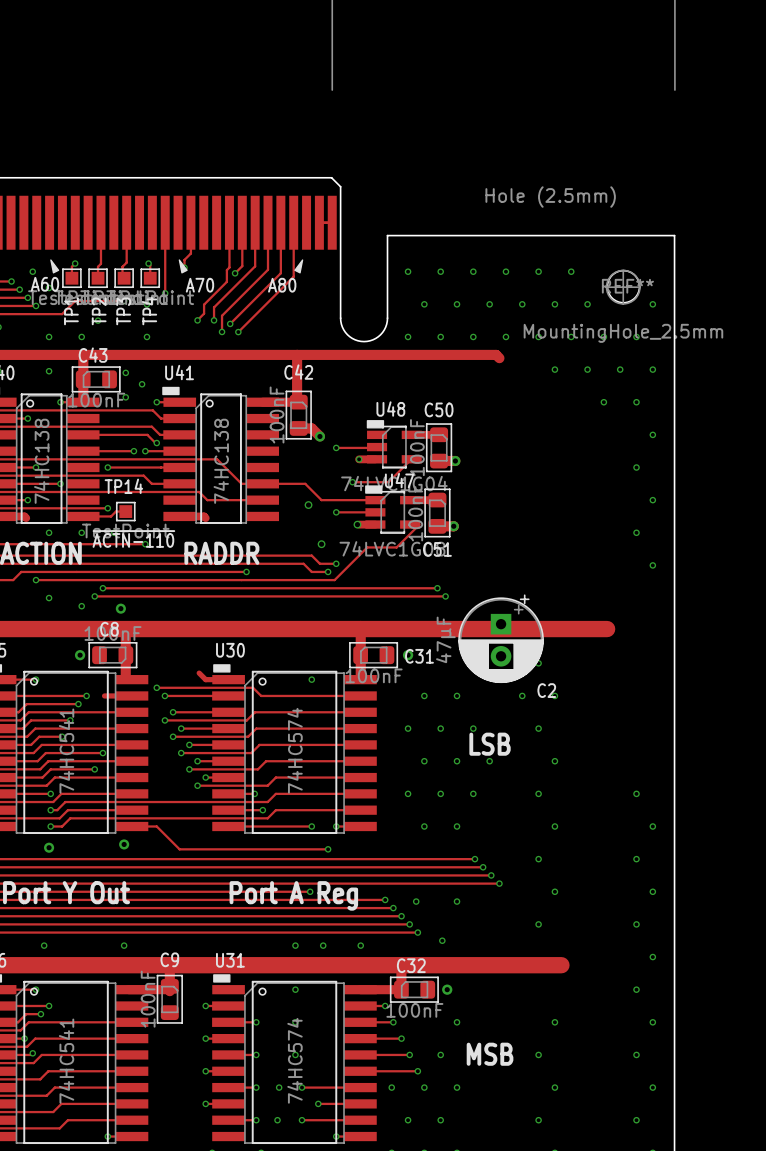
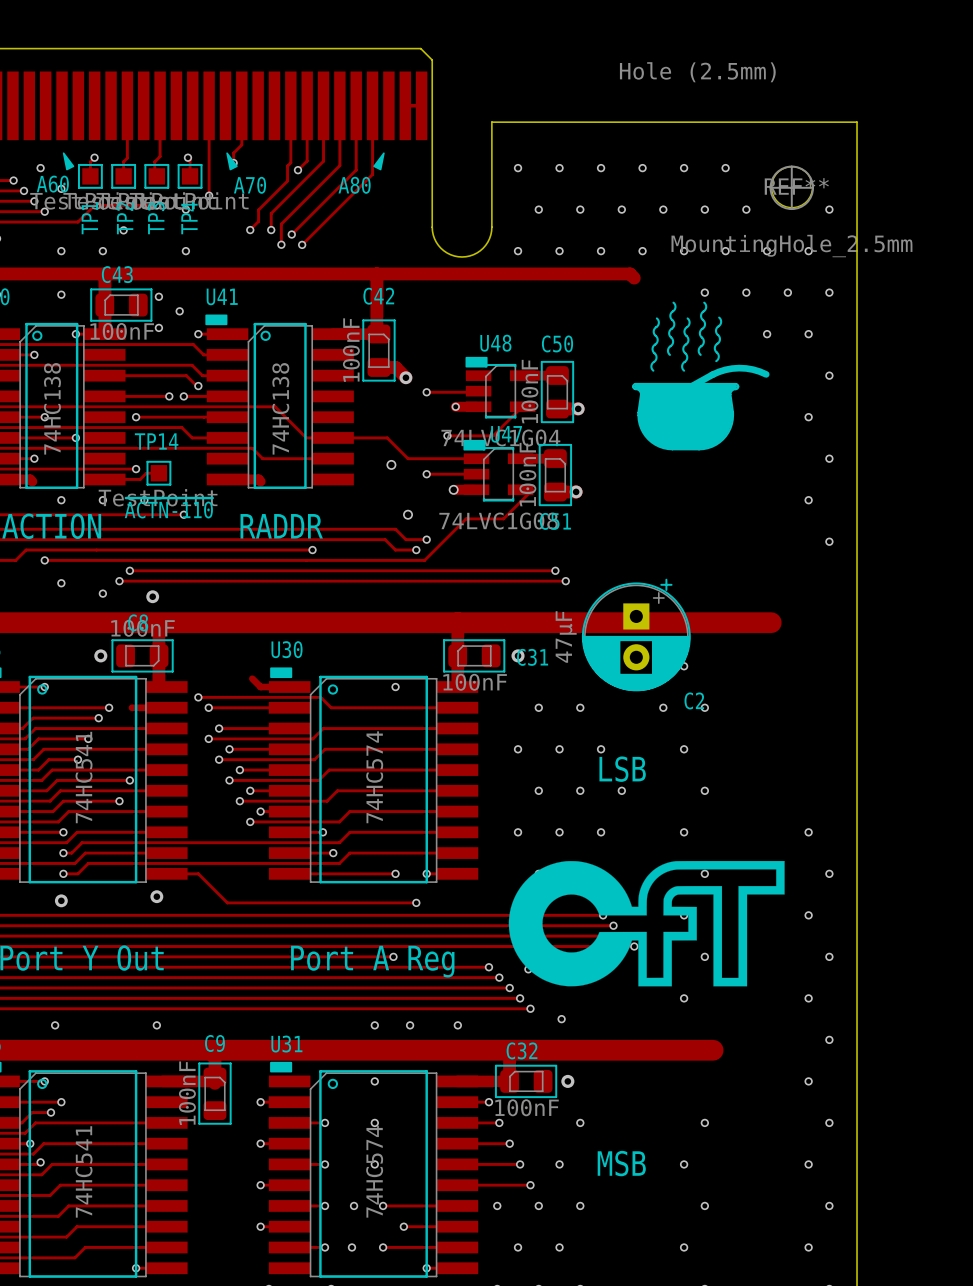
drawing: none -> [632, 301, 770, 451]
drawing: none -> [508, 860, 785, 987]

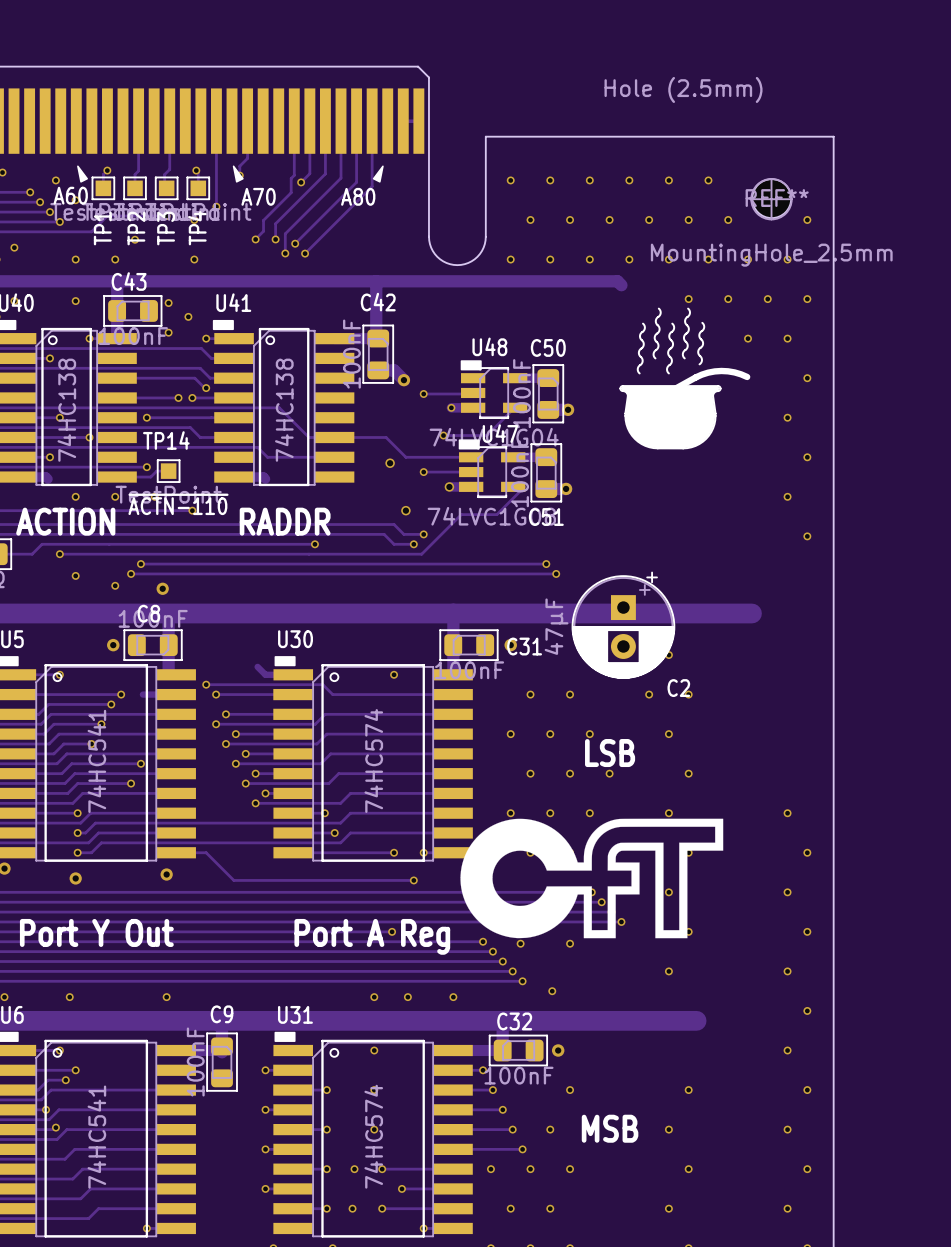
drawing position: (646, 923) -> (591, 878)

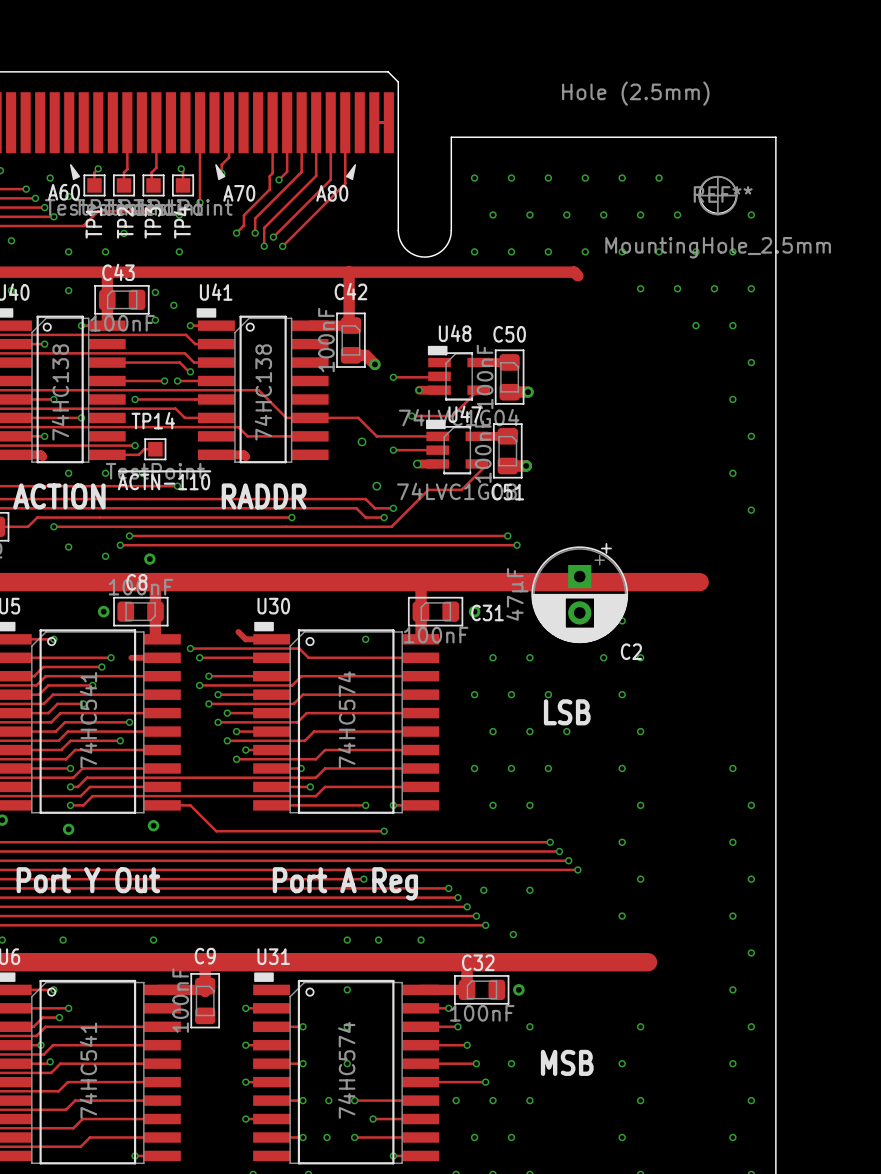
drawing: [619, 307, 751, 450] -> none
drawing: [460, 818, 724, 939] -> none

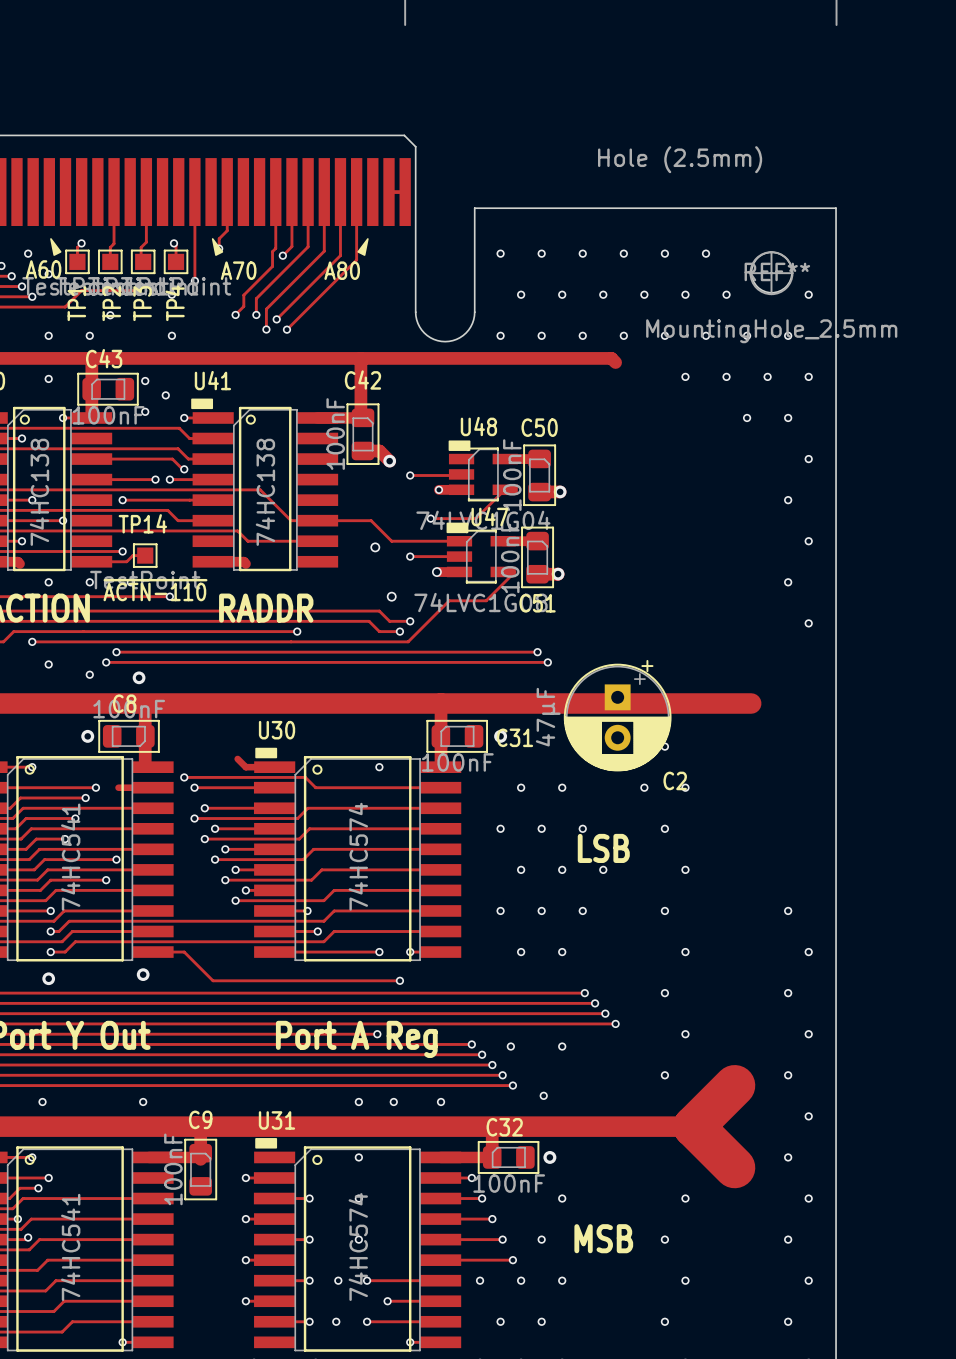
track: none -> (734, 1085) (693, 1126) (734, 1167)

